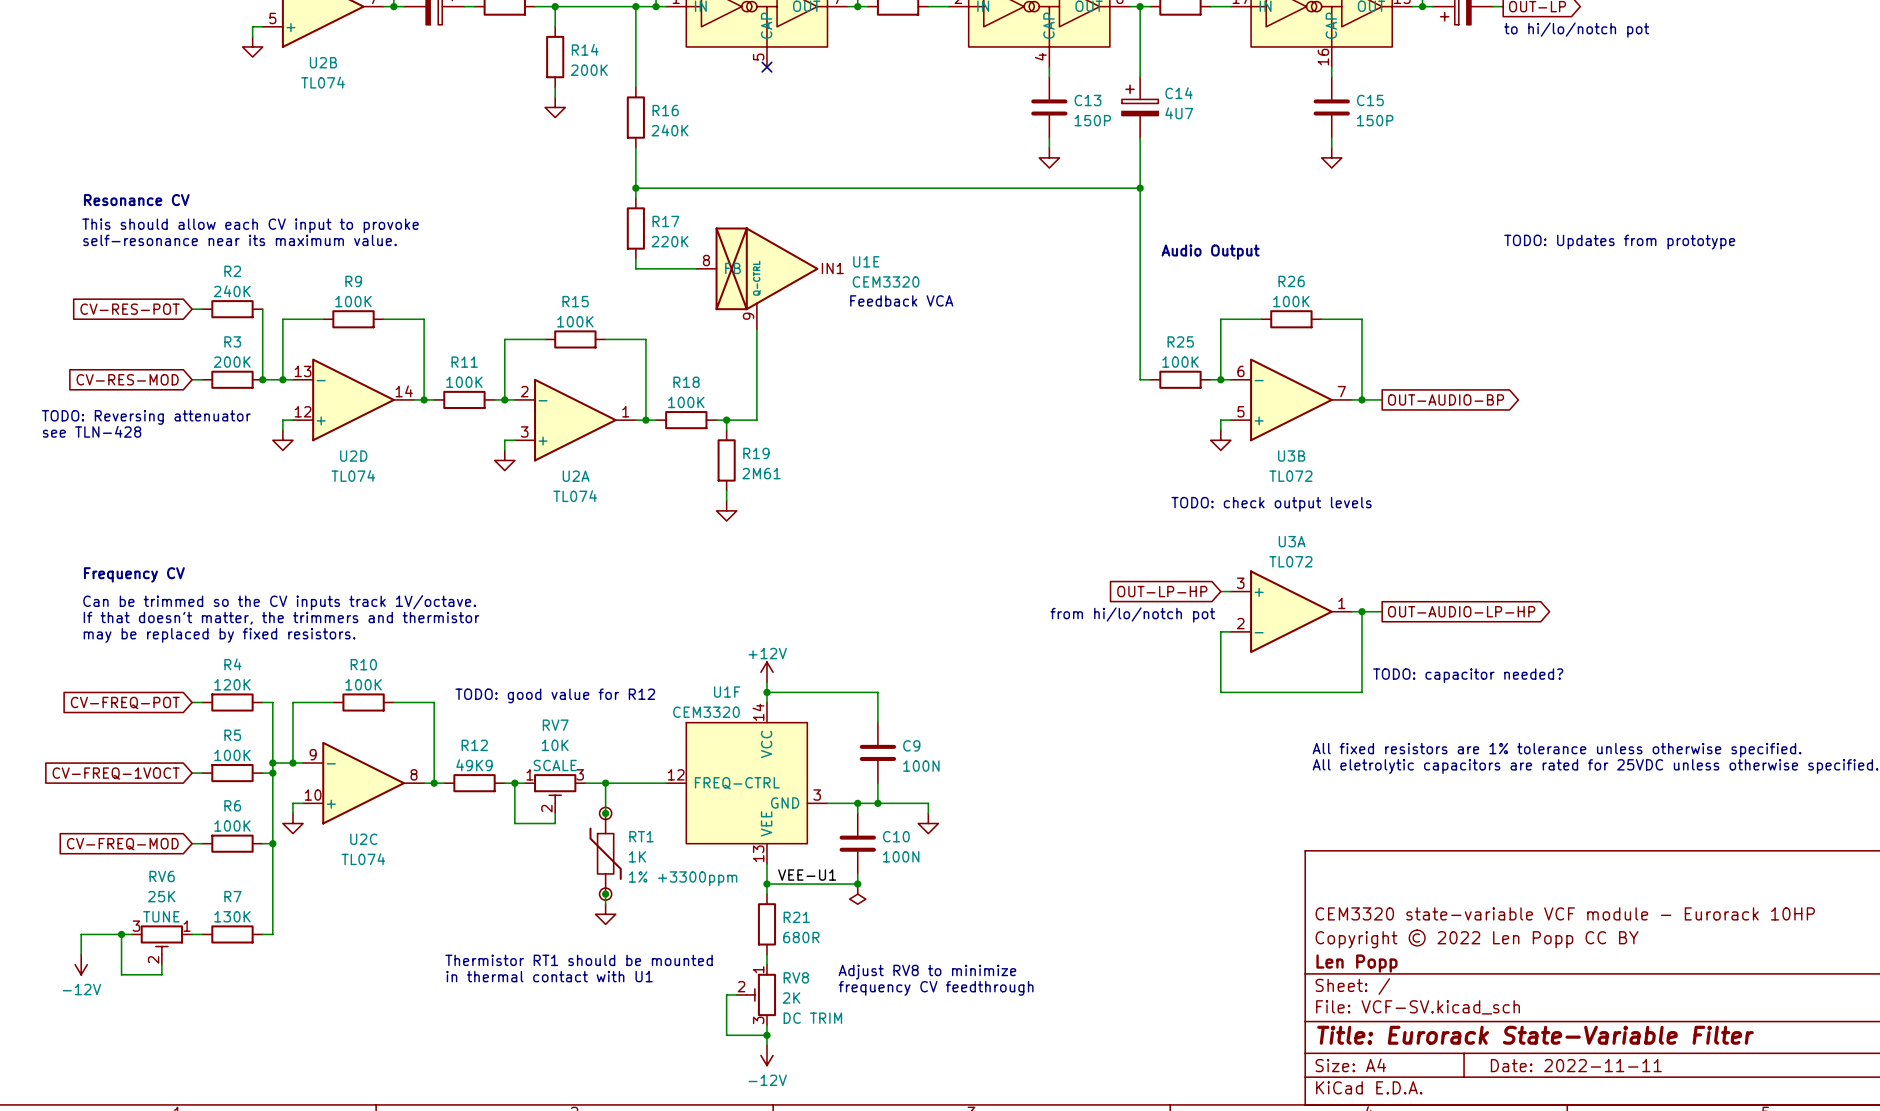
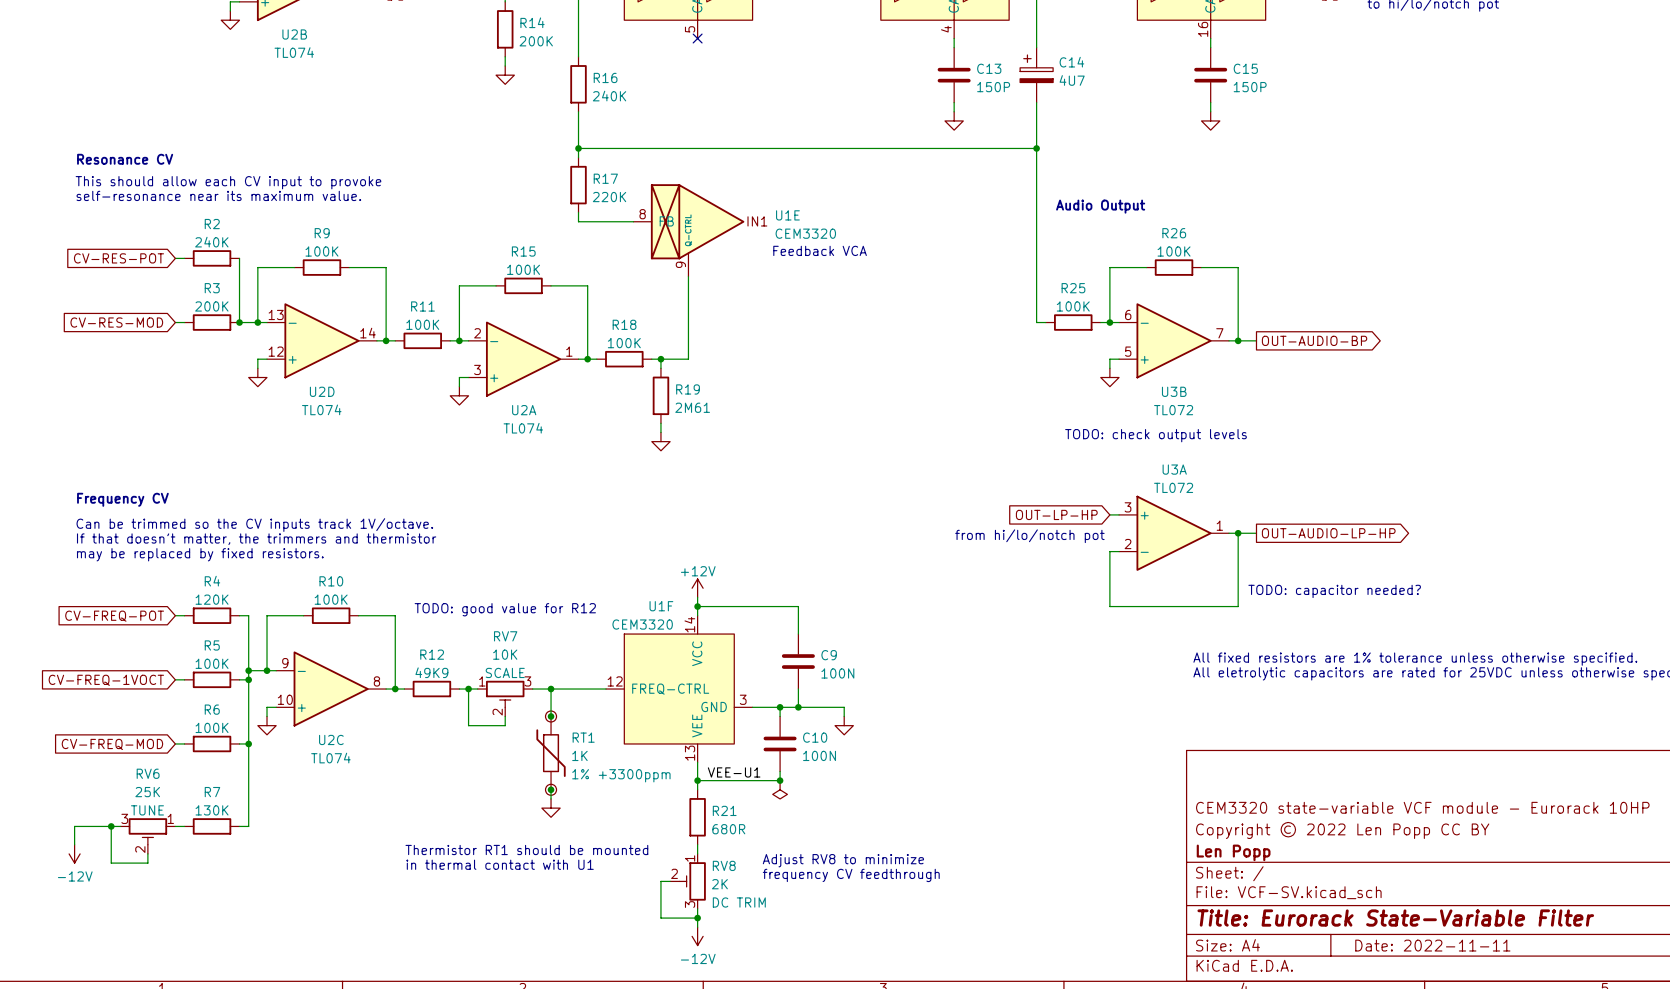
text: TODO: Updates from prototype (1619, 242) -> none
text: TODO: Reversing attenuator (146, 417) -> none
text: see TLN-428 (92, 431) -> none

